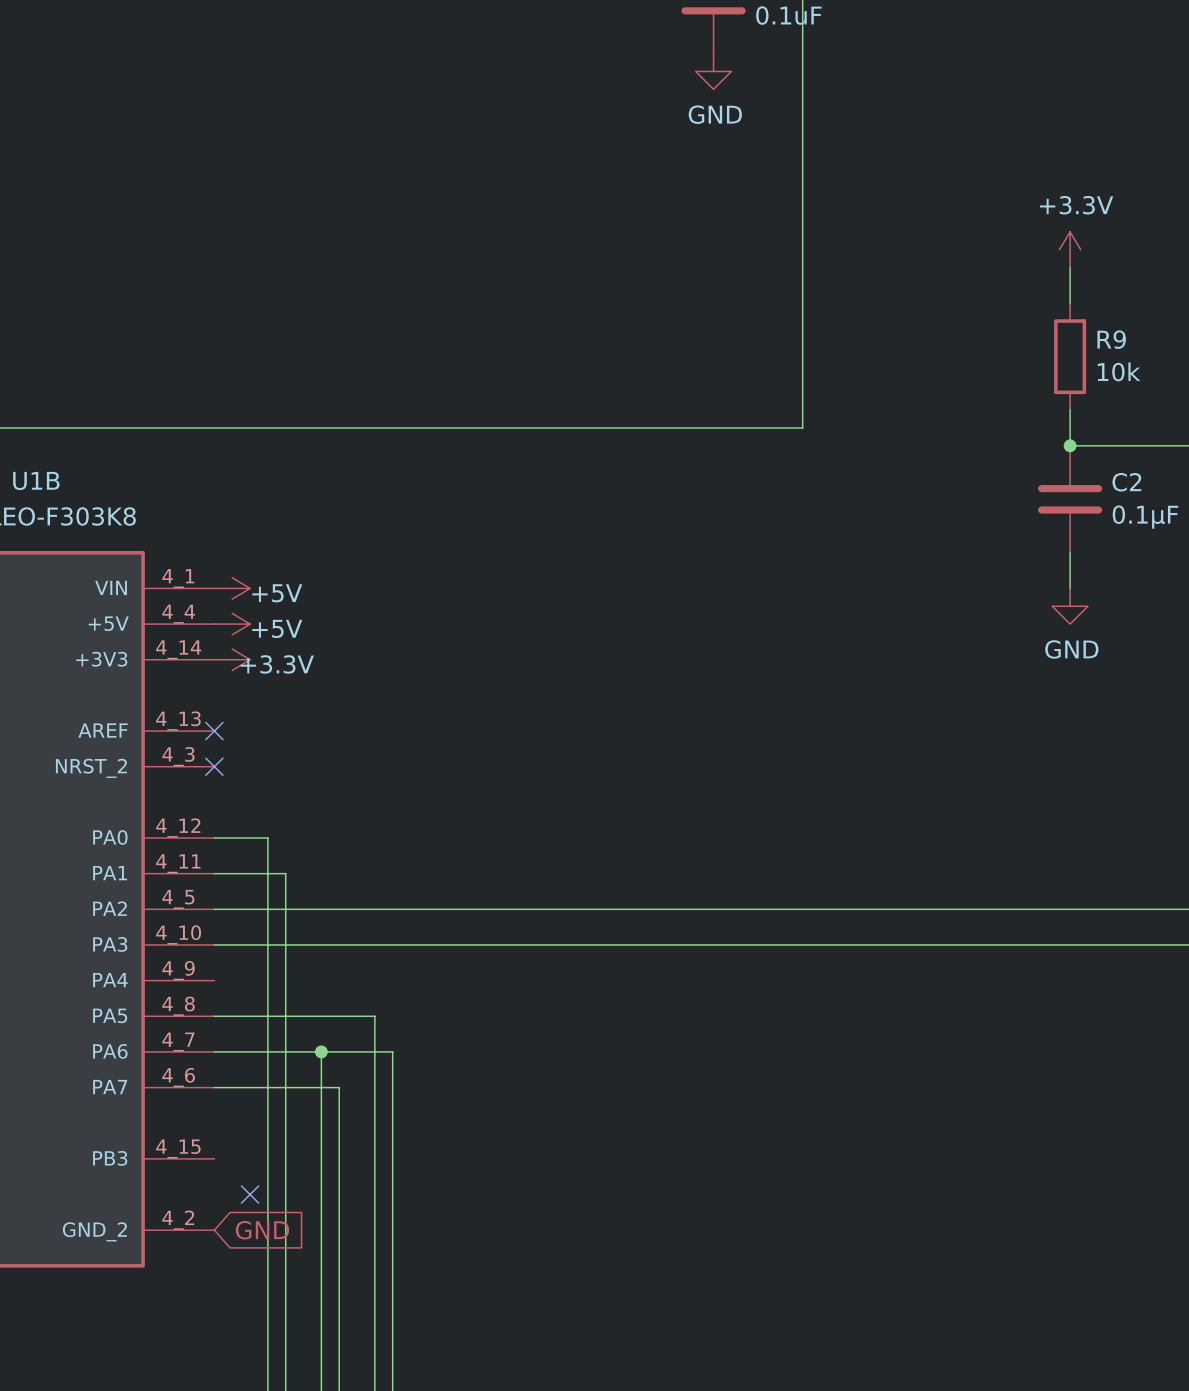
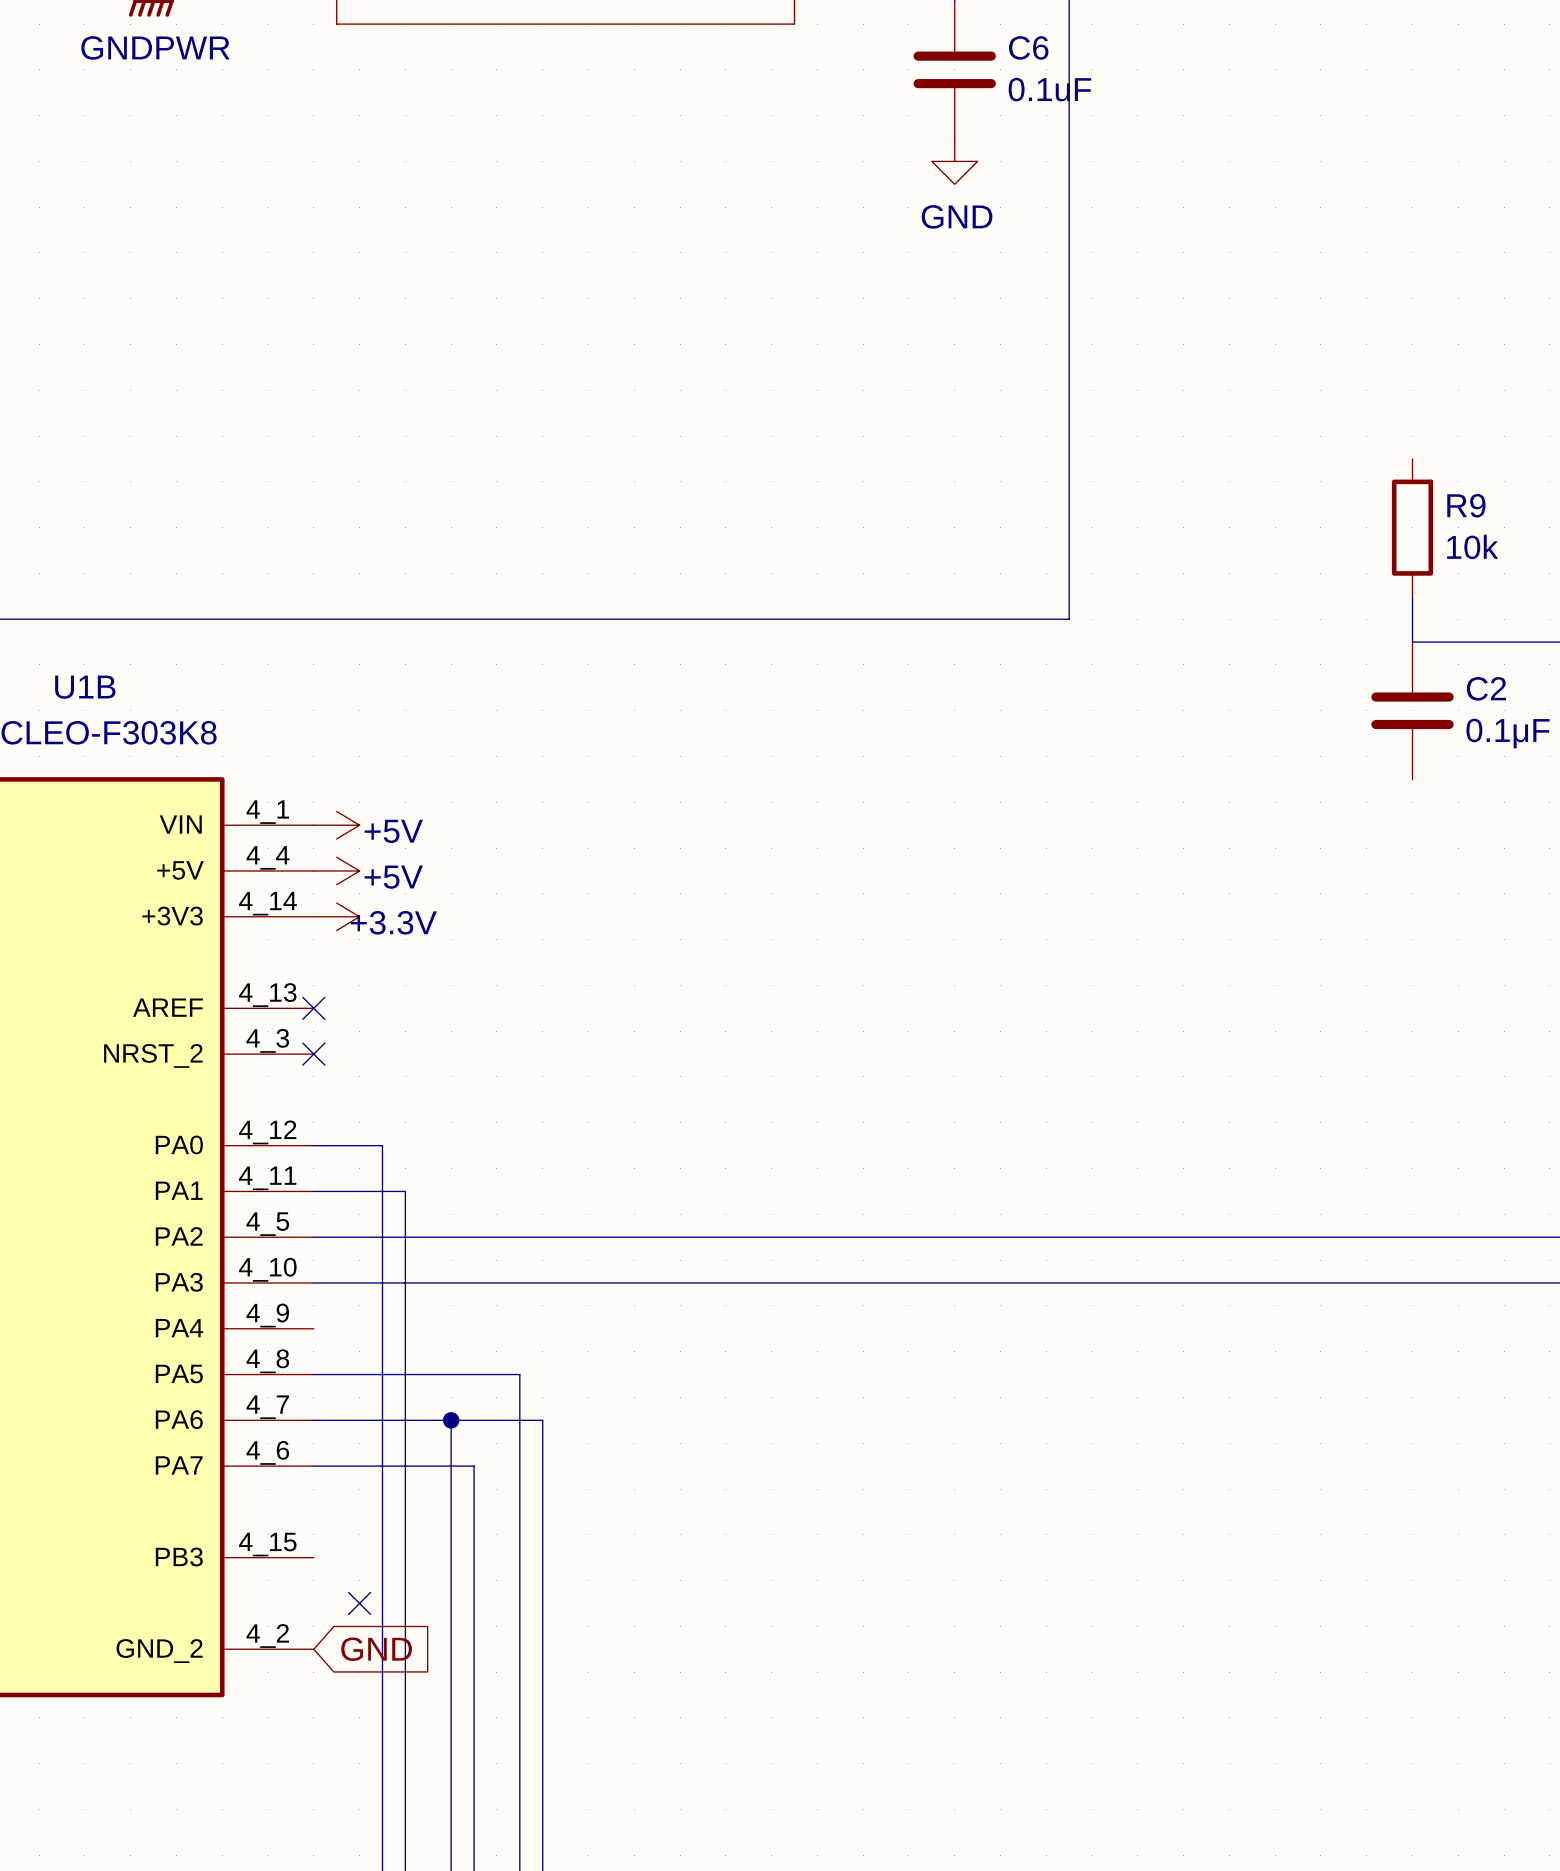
power symbol: +3.3V (1070, 249) -> none
wire: (1070, 267) (1070, 303) -> none
junction: (1070, 445) -> none
wire: (1070, 552) (1070, 588) -> none
power symbol: GND (1070, 606) -> none

